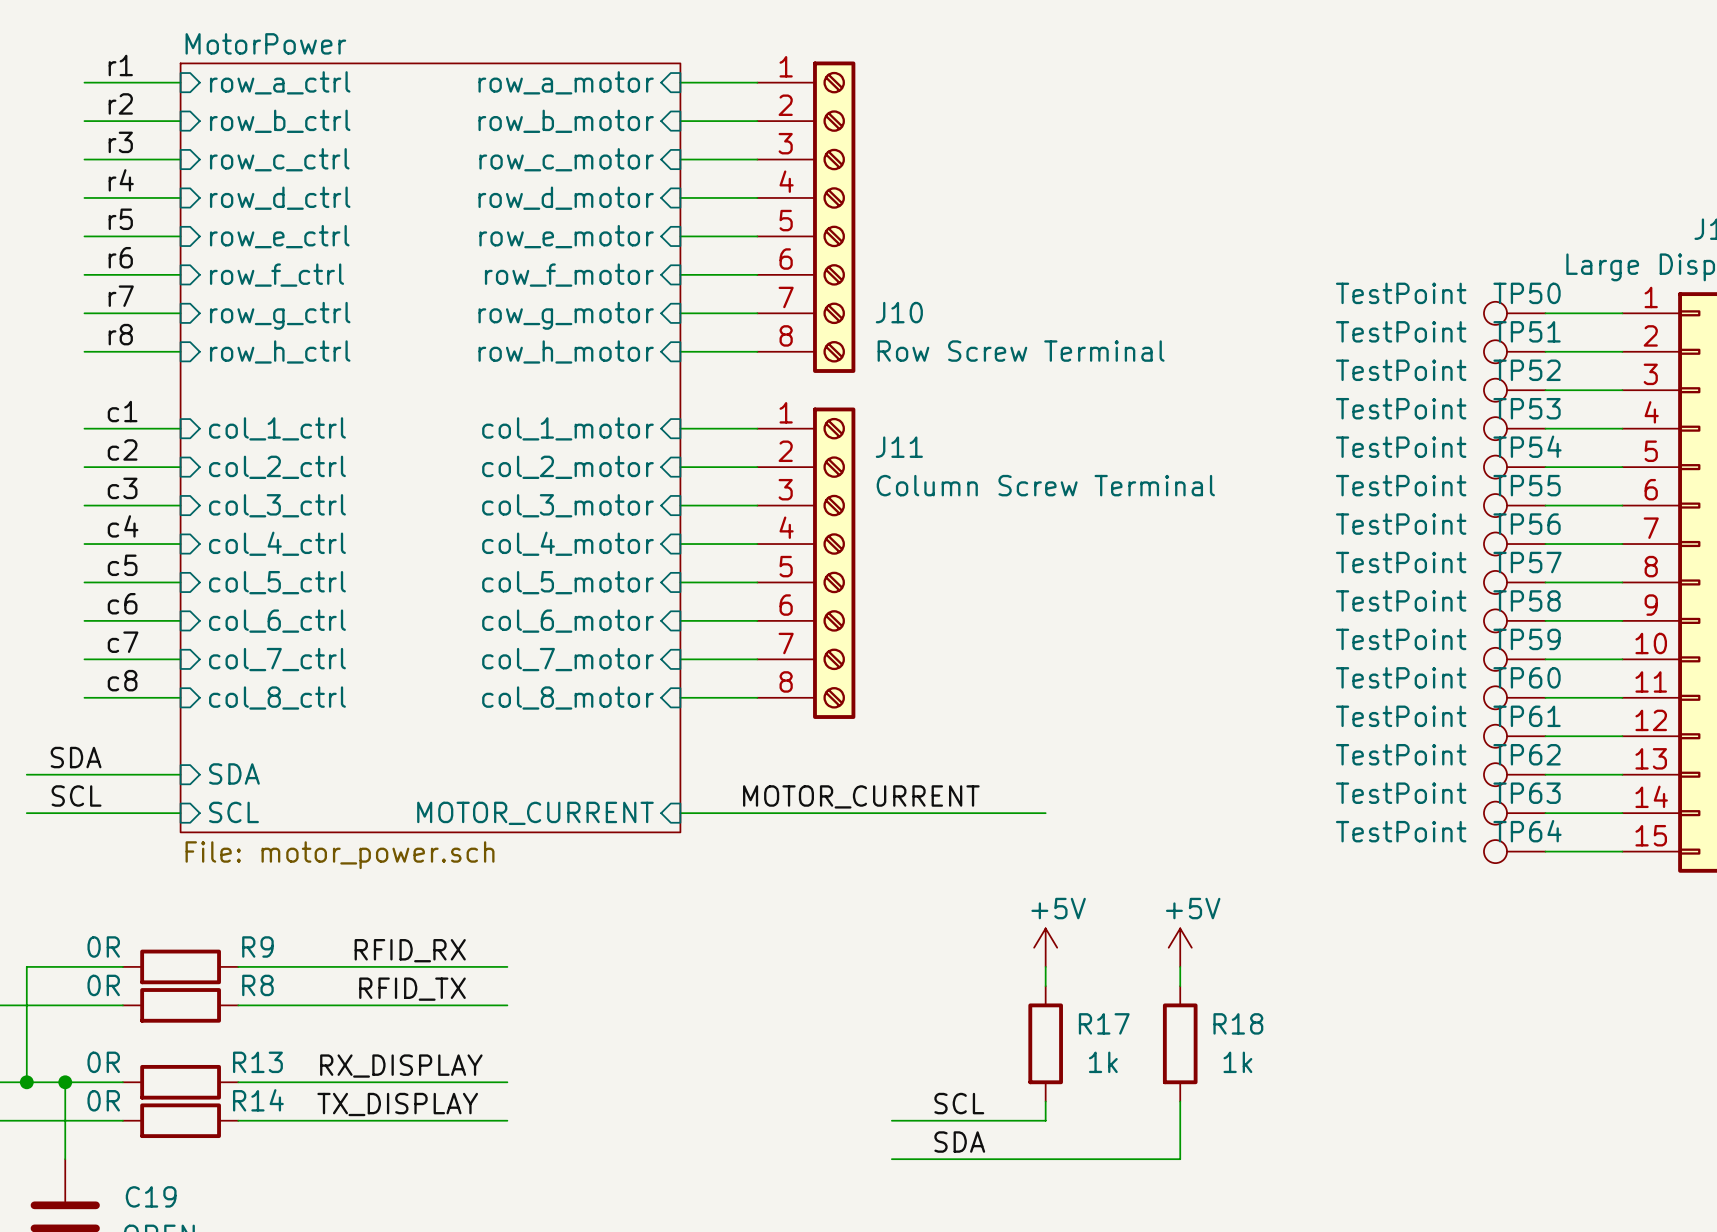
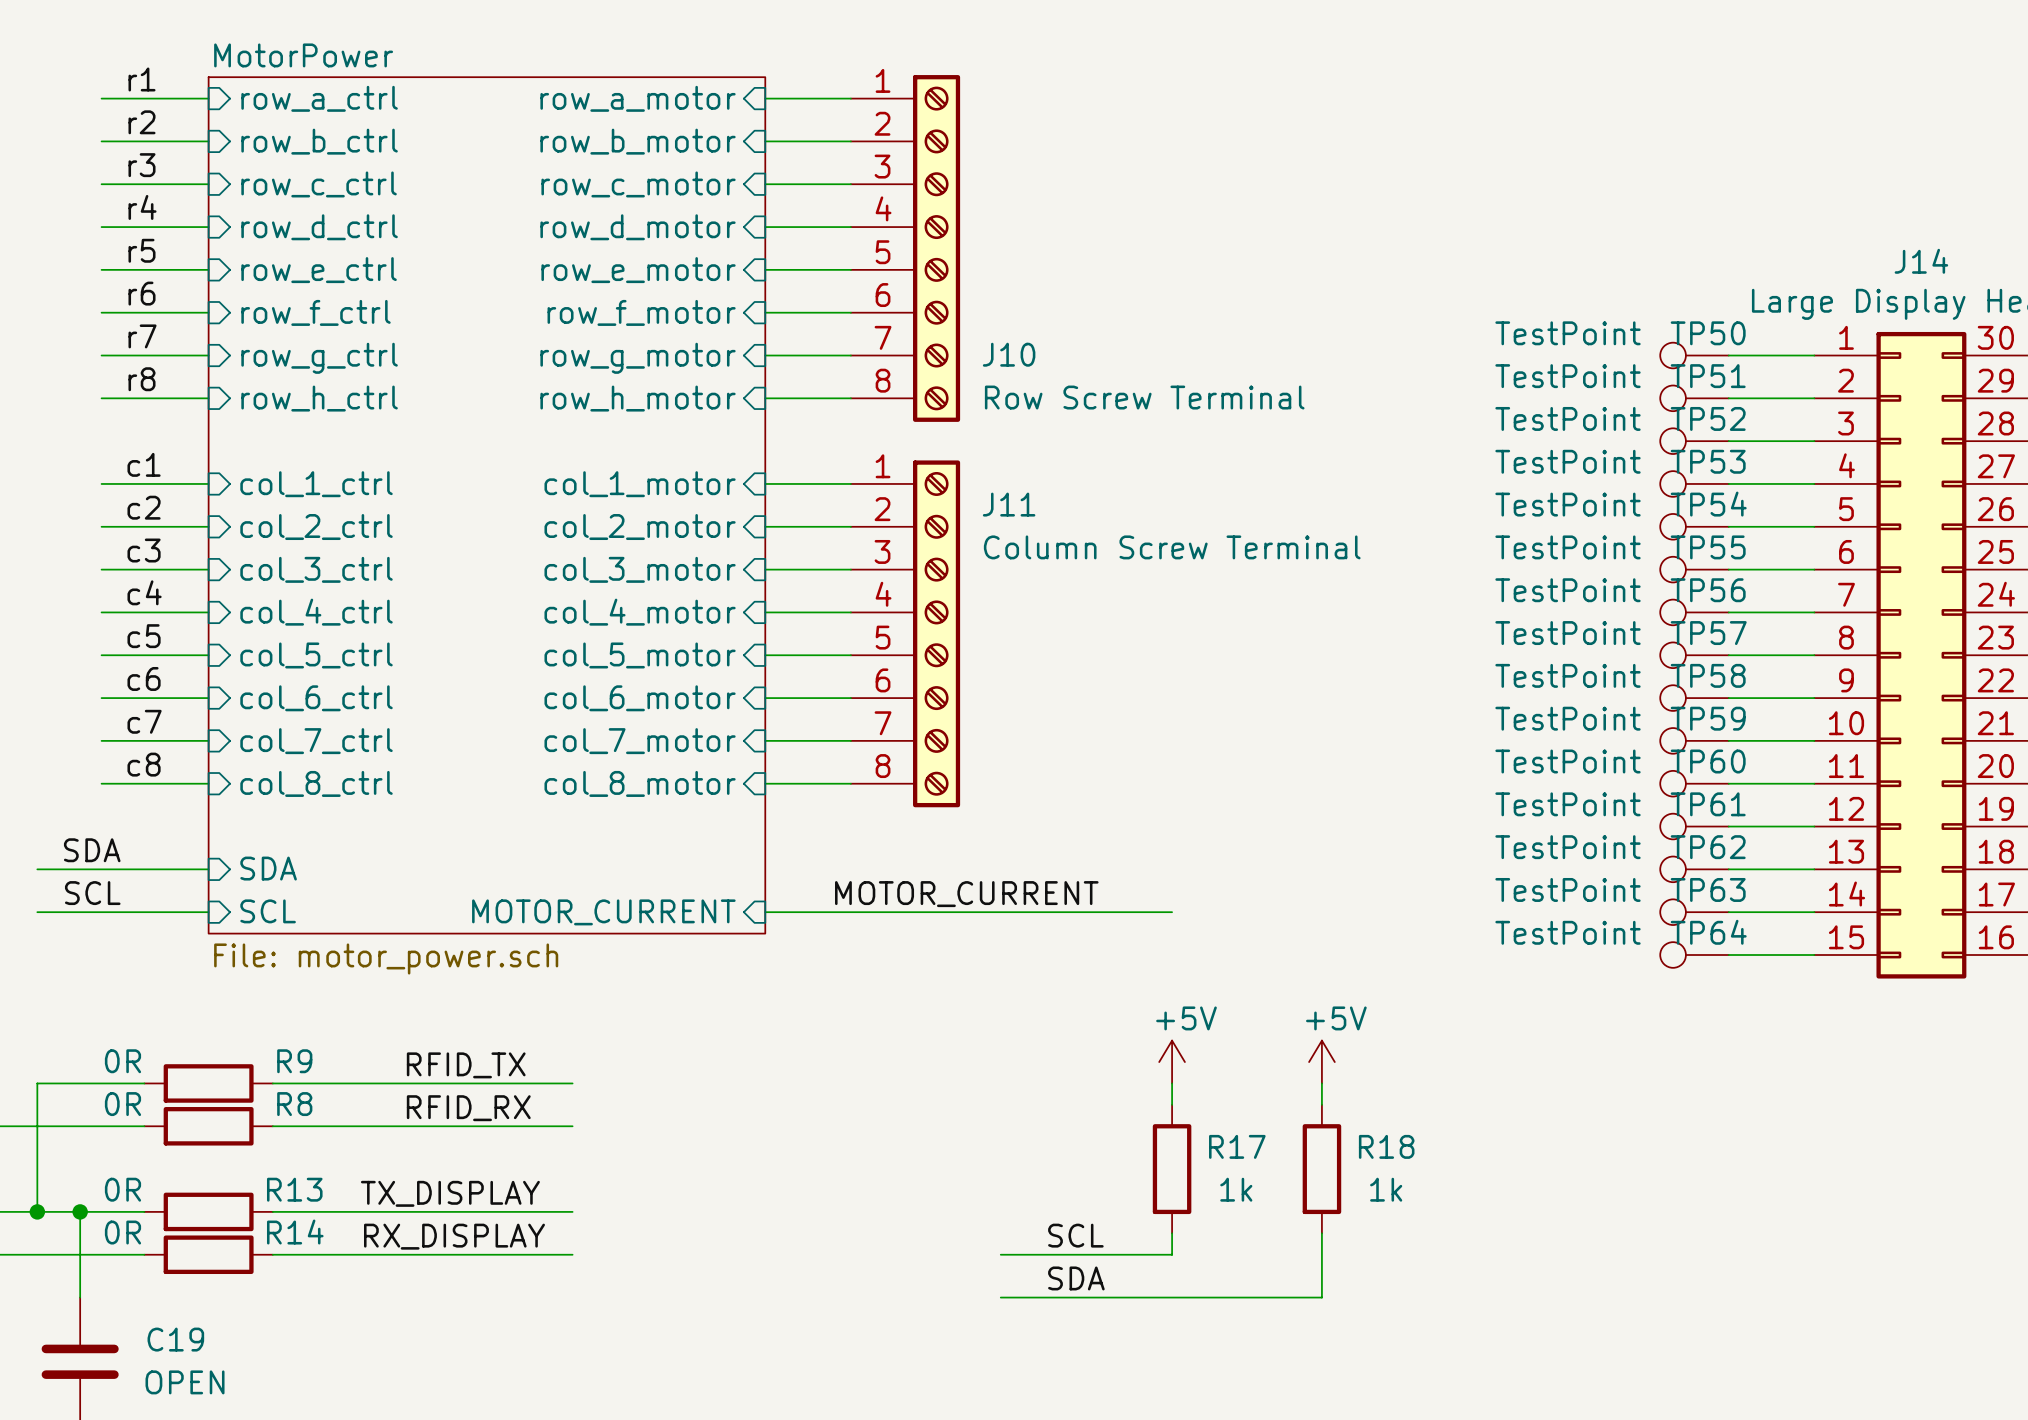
label position: RFID_RX (410, 950) -> RFID_RX (468, 1108)
label position: RFID_TX (412, 989) -> RFID_TX (466, 1065)
label: RX_DISPLAY (401, 1066) -> TX_DISPLAY (450, 1193)
label: TX_DISPLAY (397, 1104) -> RX_DISPLAY (454, 1236)

